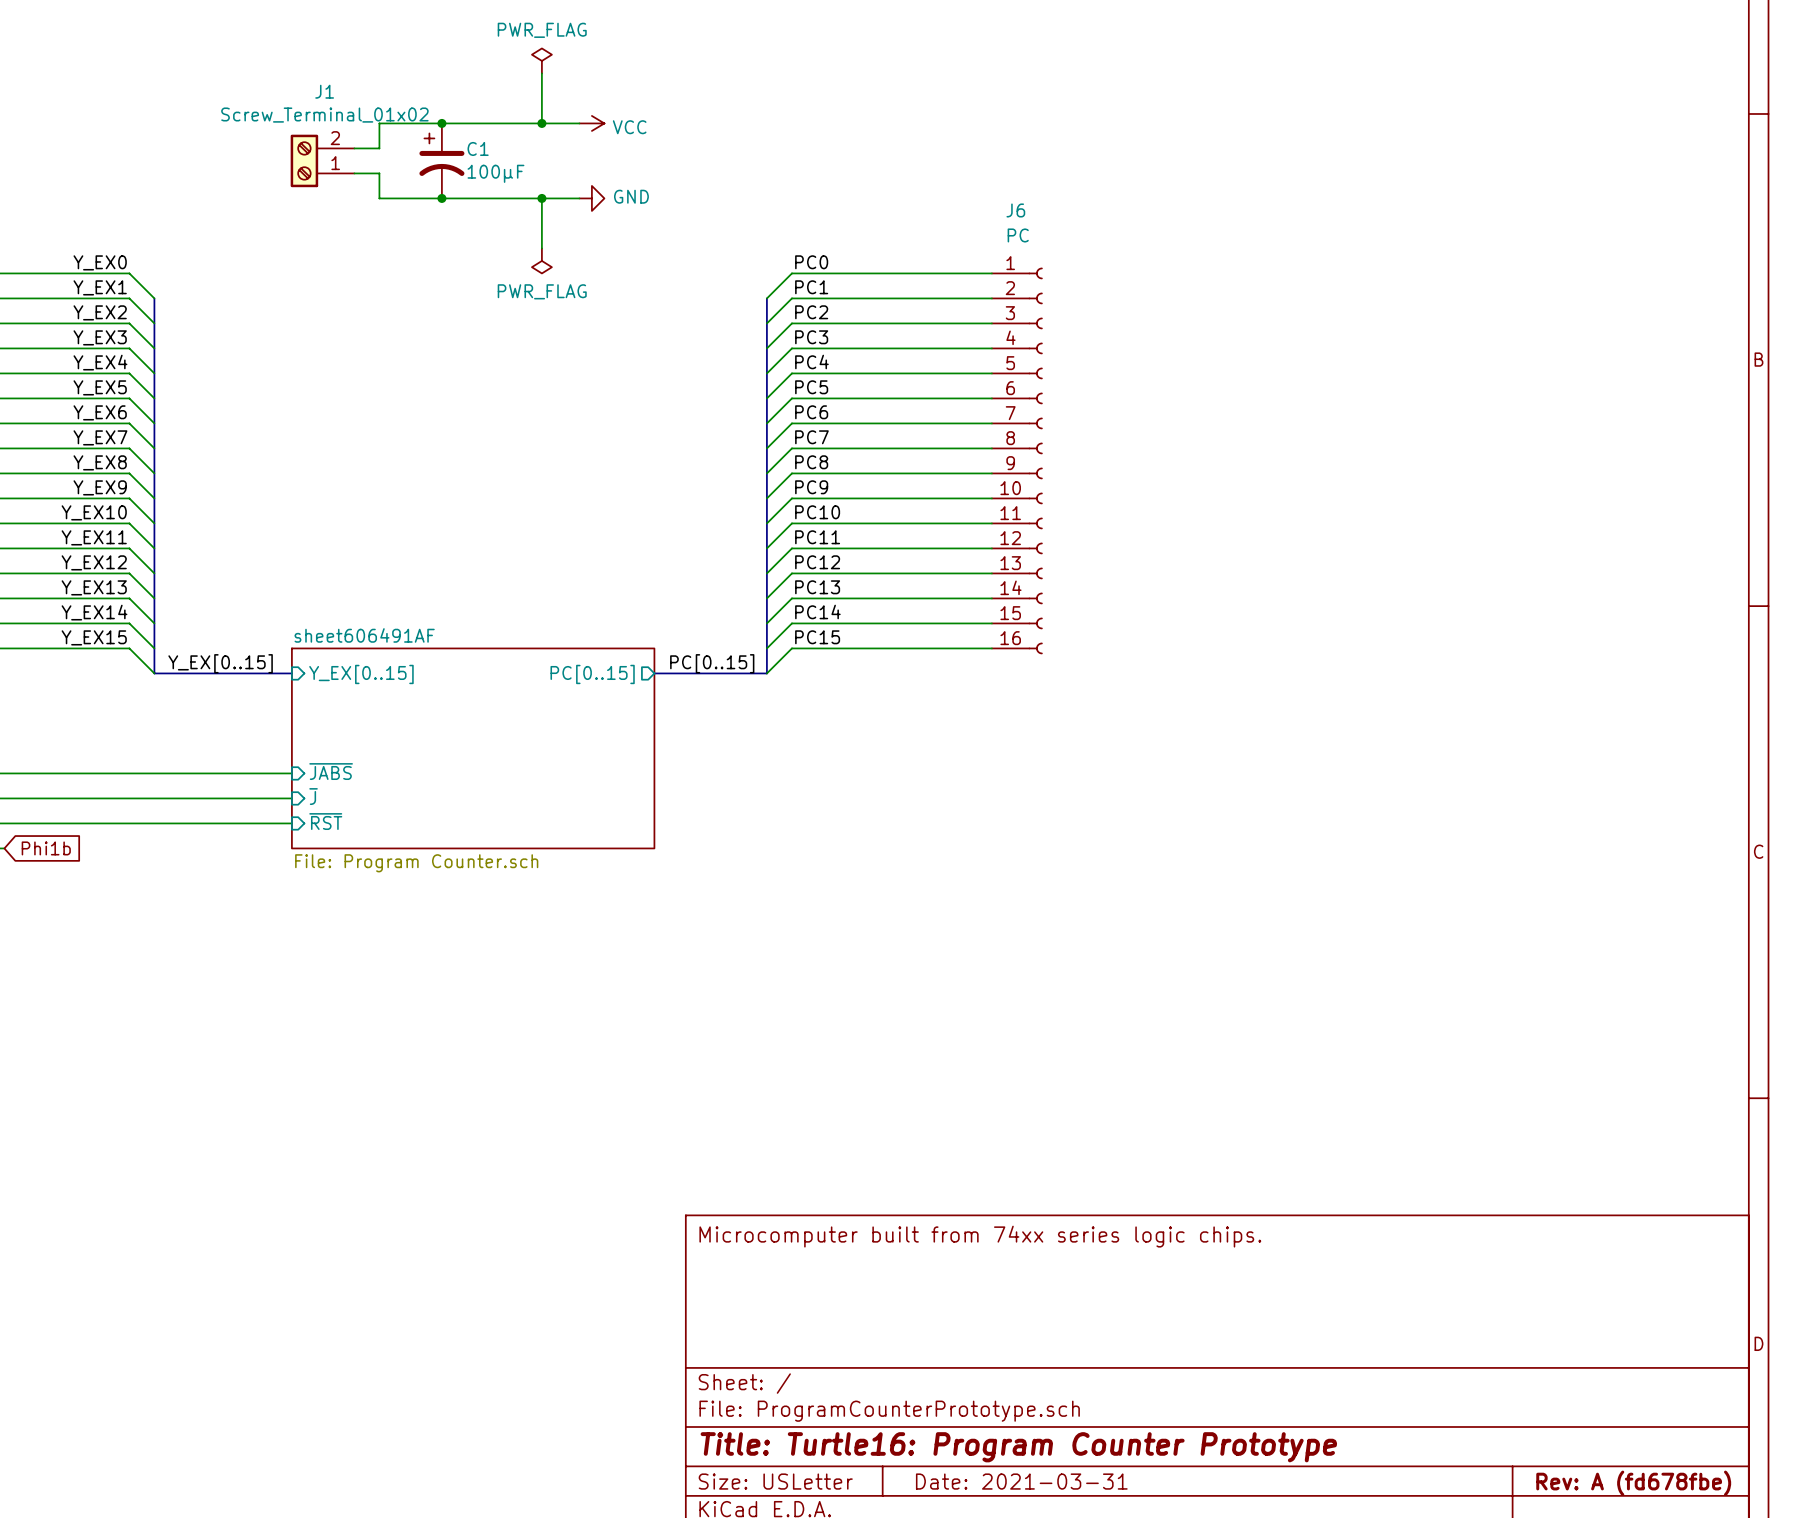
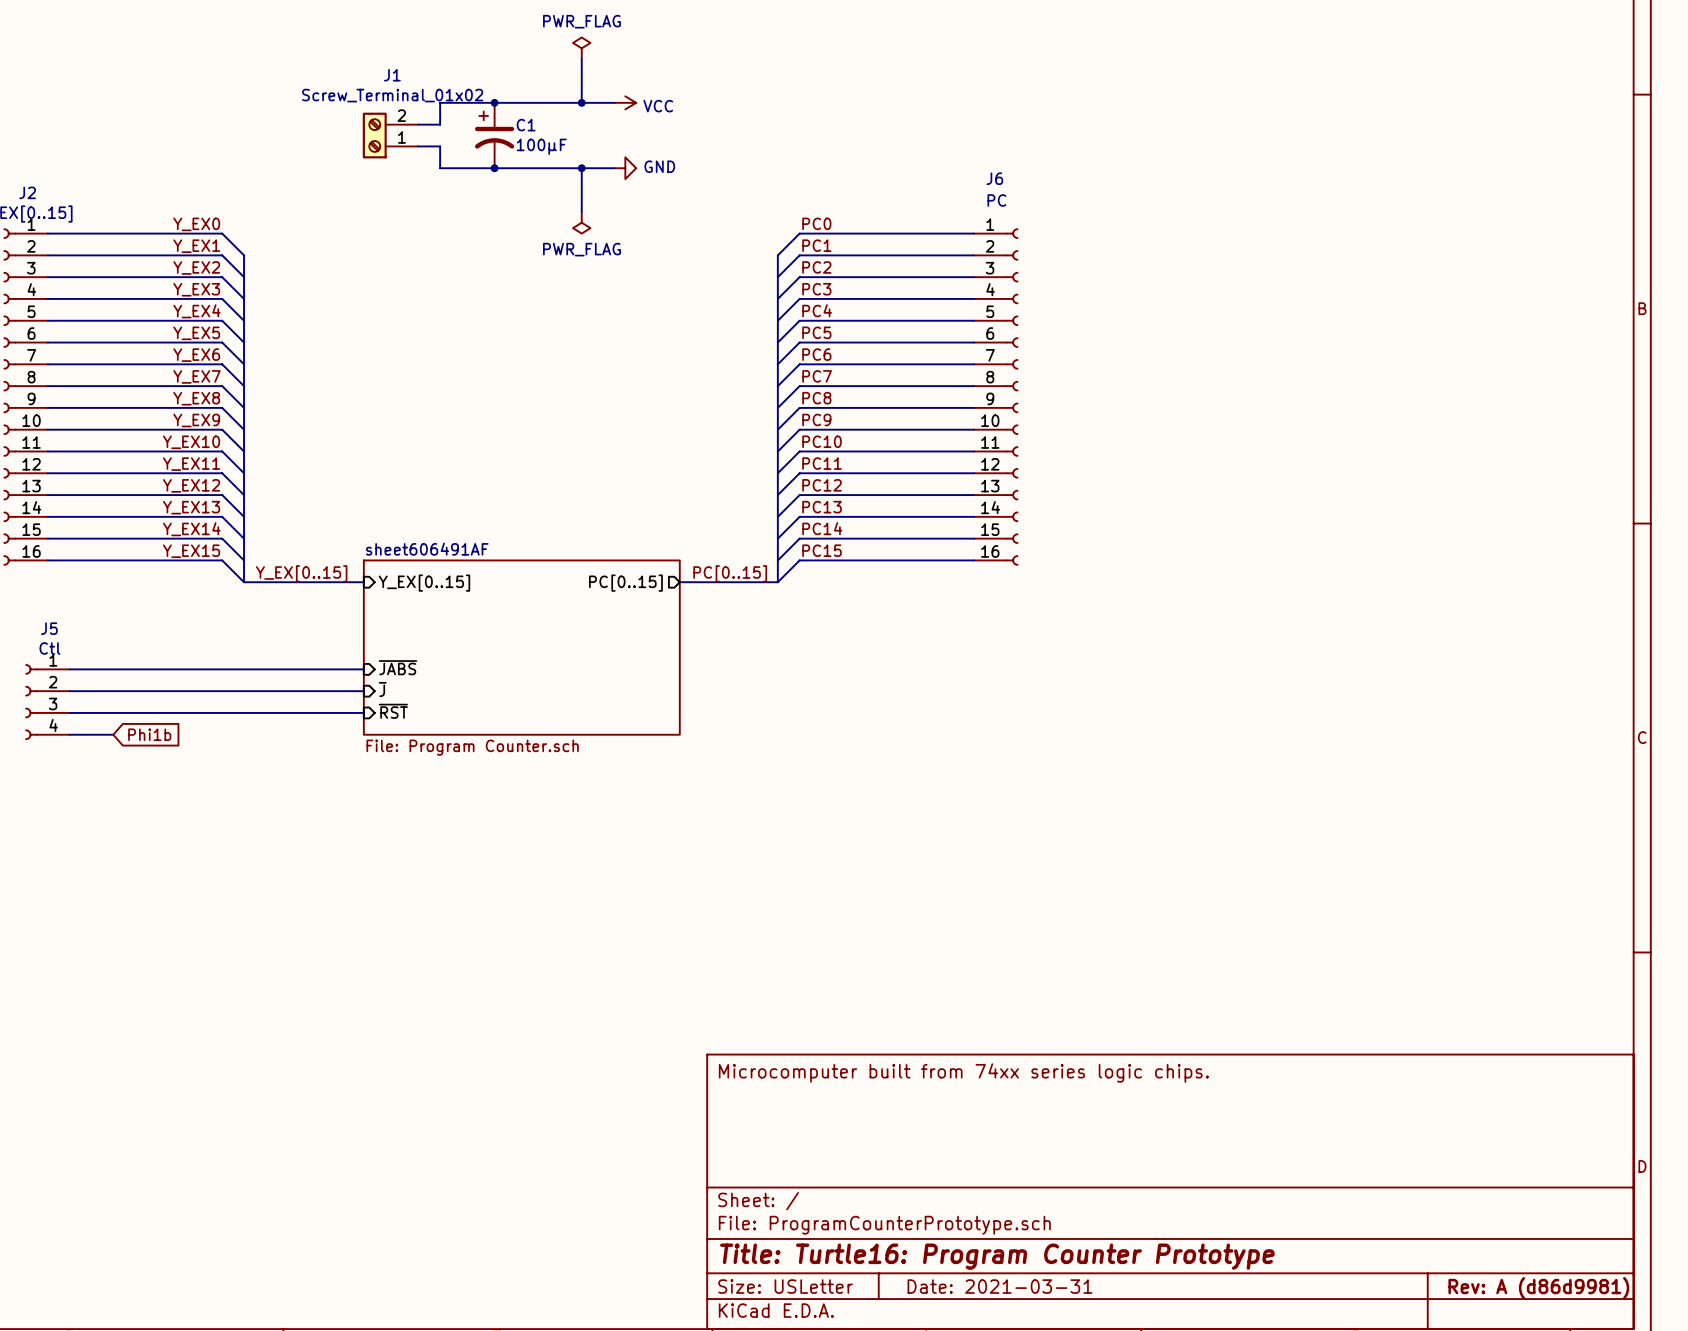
title block: Rev: A (fd678fbe) (1633, 1483) -> Rev: A (d86d9981) (1538, 1288)

